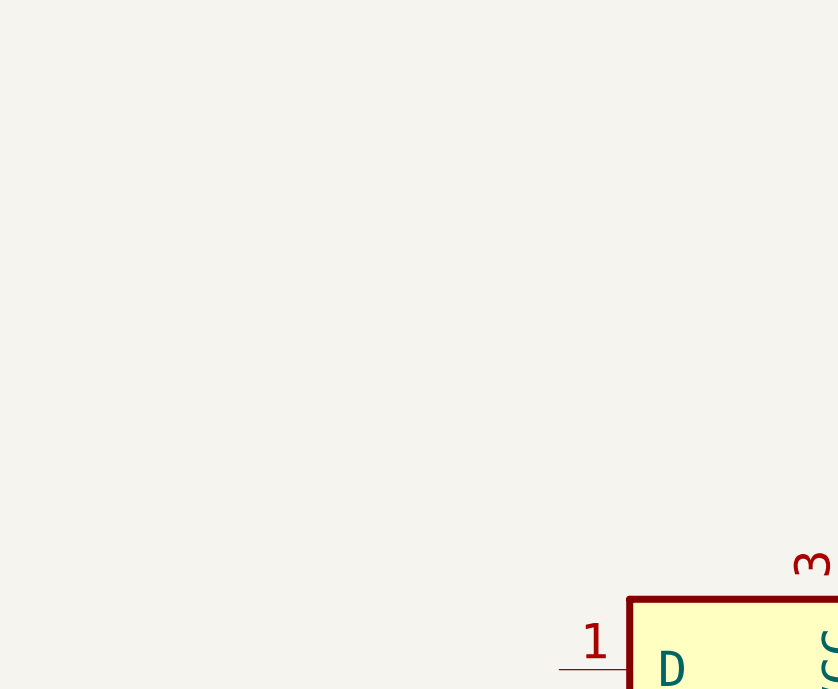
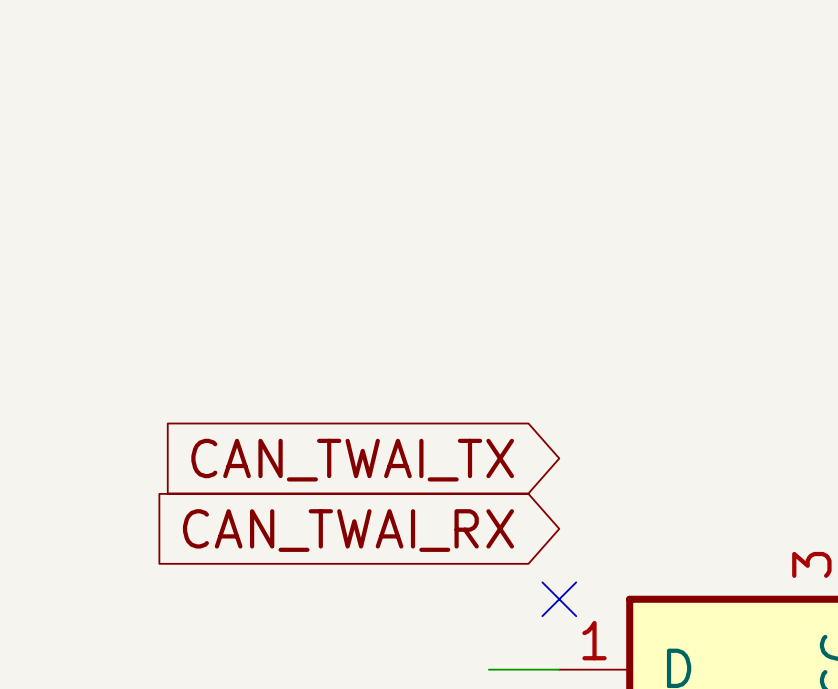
global label: none -> CAN_TWAI_TX (352, 460)
global label: none -> CAN_TWAI_RX (348, 530)
no-connect mark: none -> (559, 599)
wire: none -> (488, 669) (559, 669)

